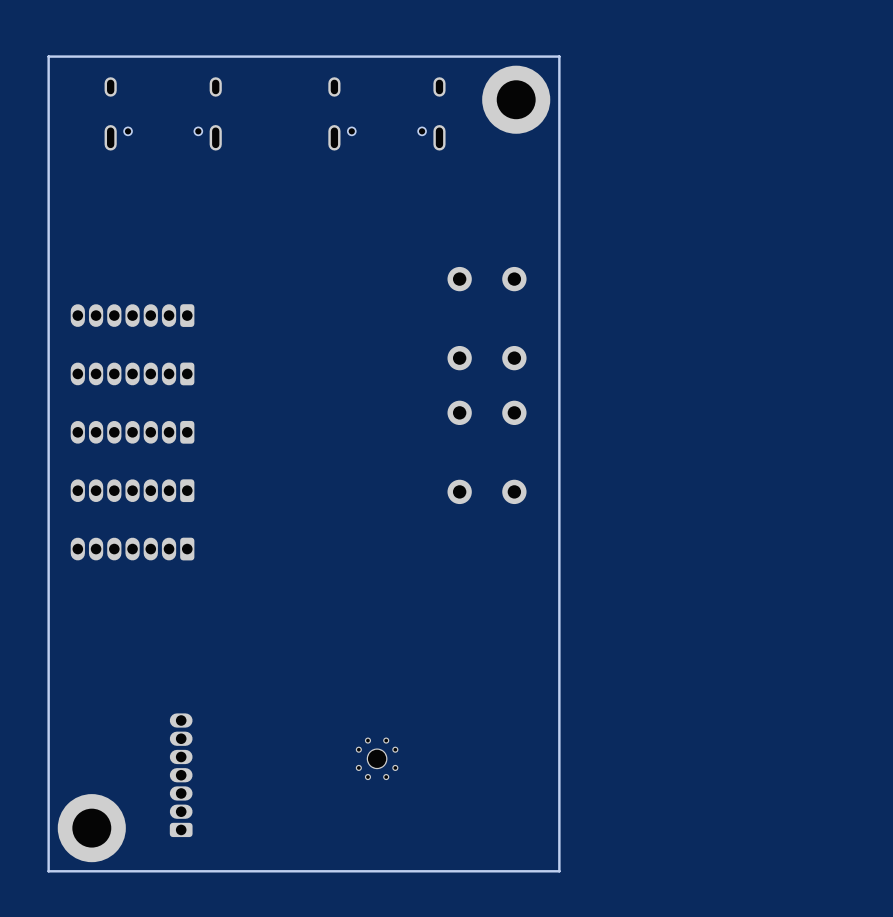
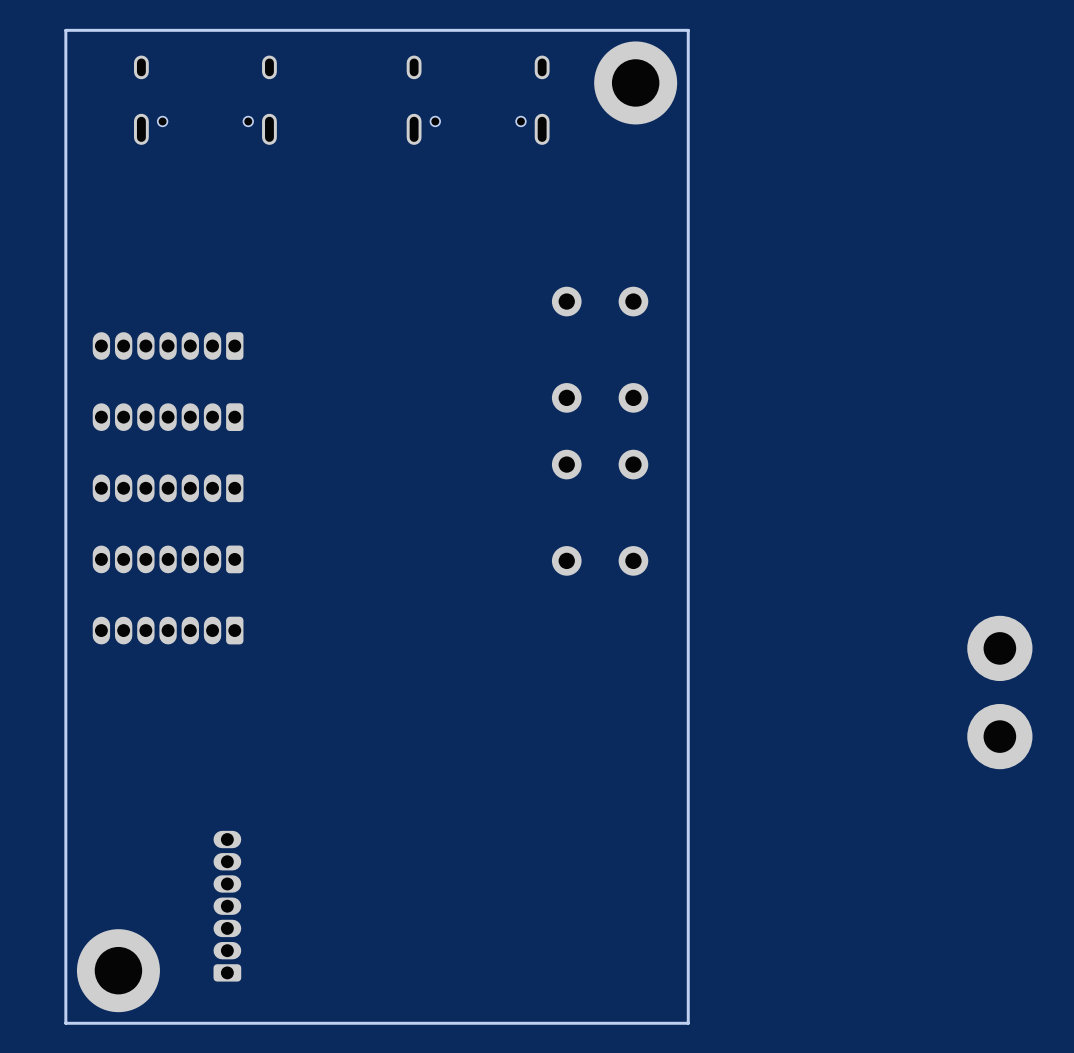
part: none -> (999, 648)
part: none -> (999, 736)
part: (377, 758) -> none

